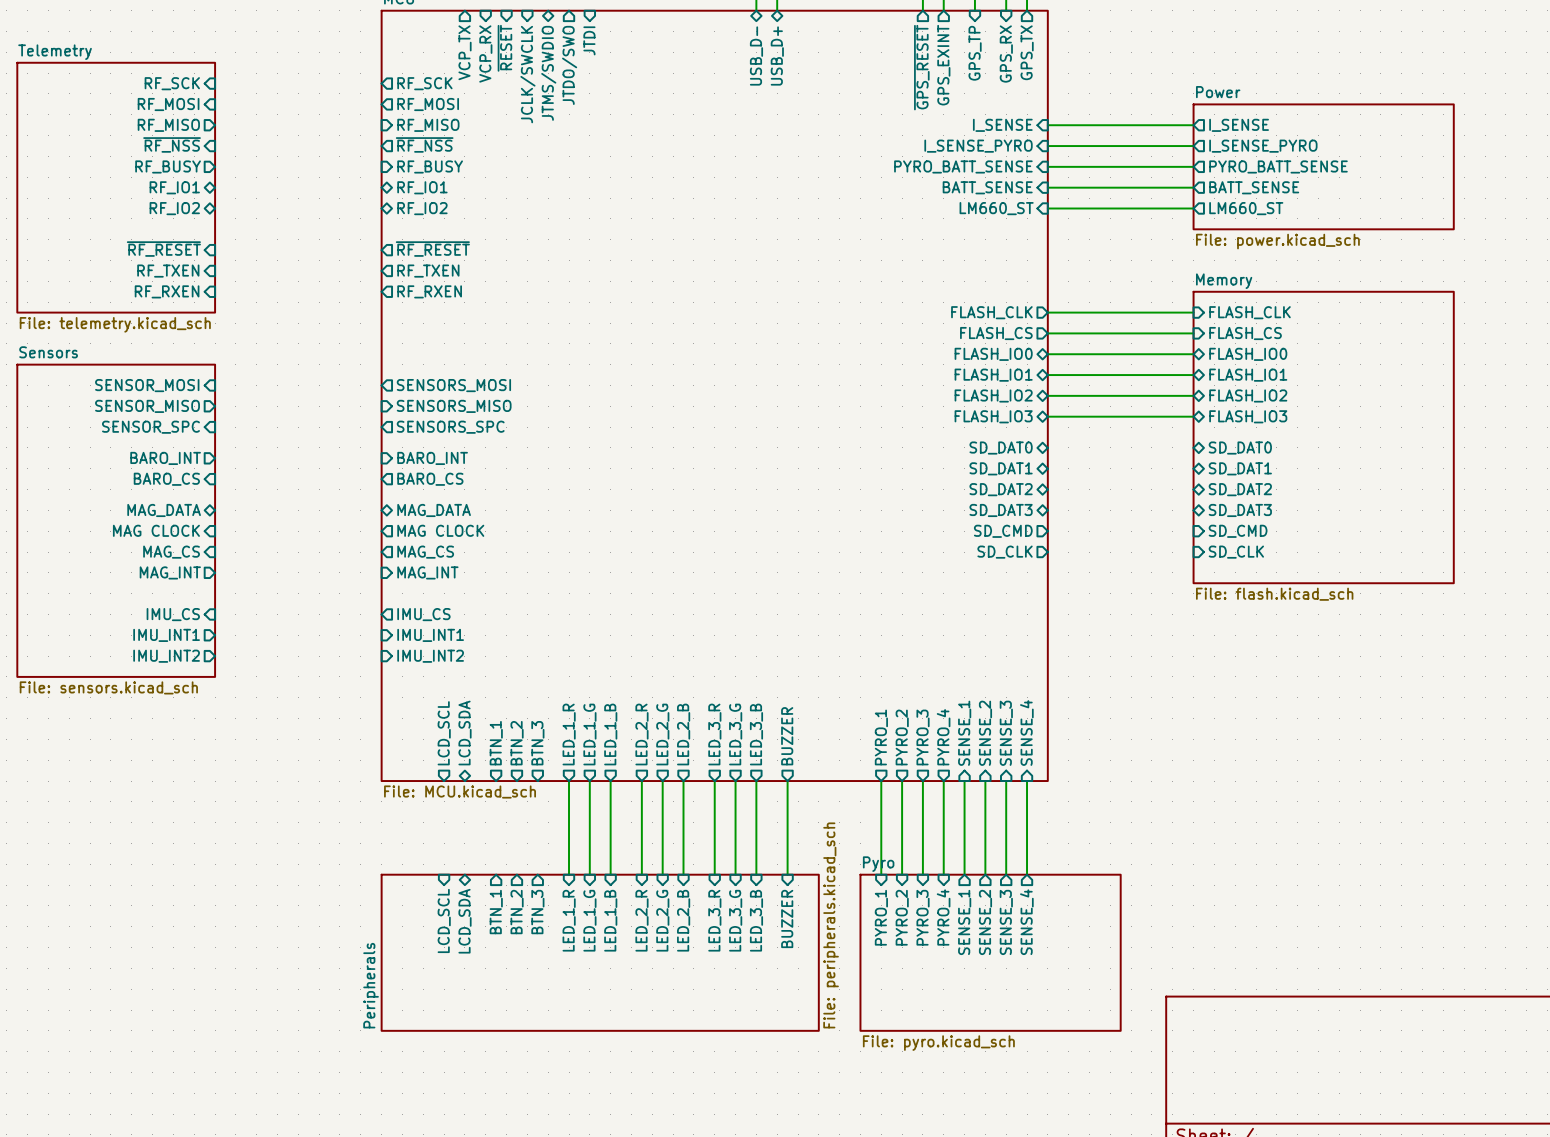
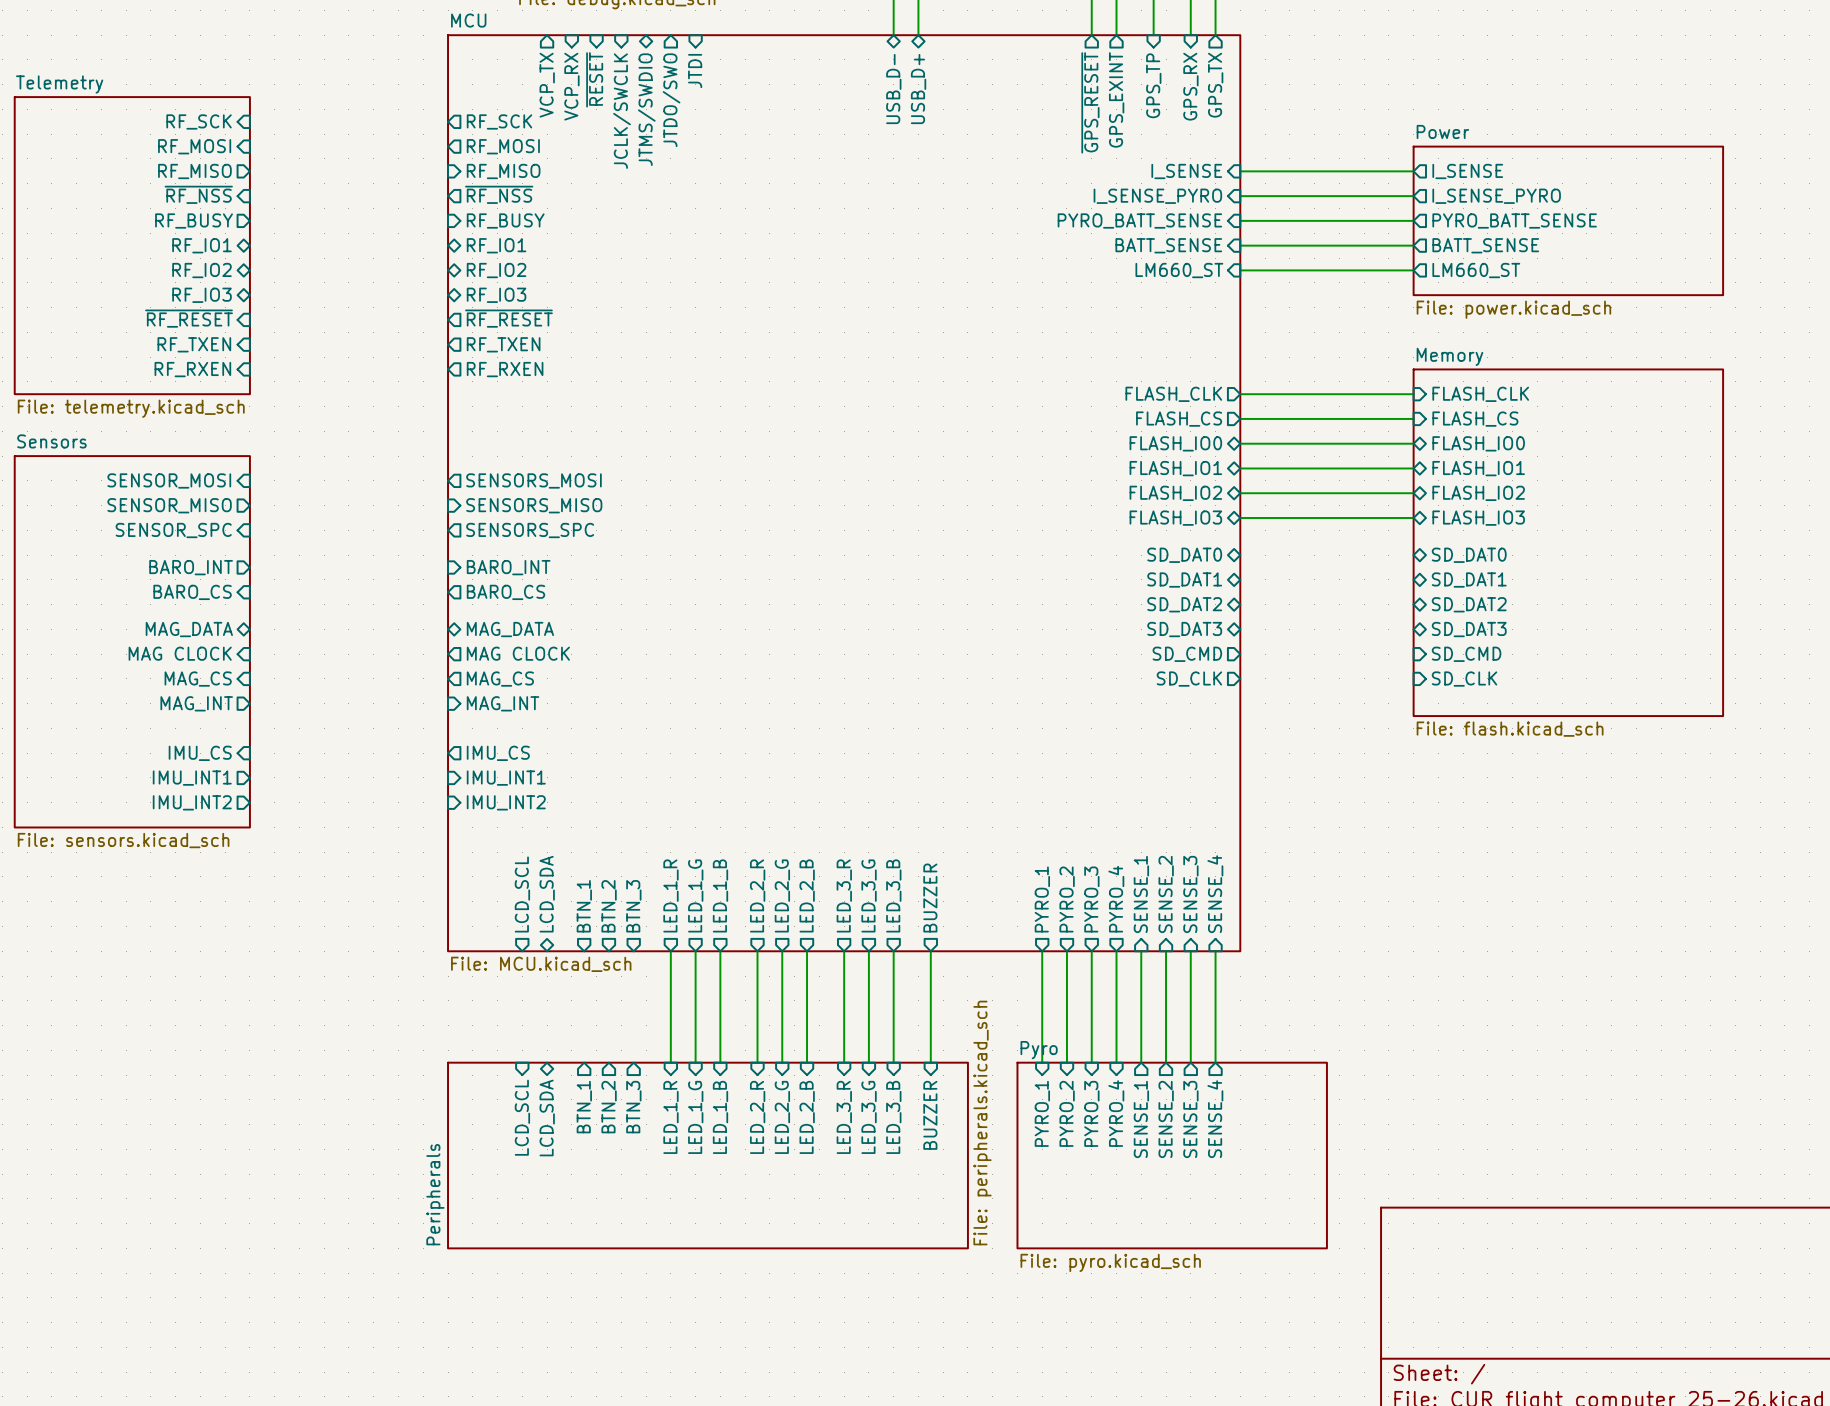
sheet pin: none -> RF_IO3 (201, 295)
sheet pin: none -> RF_IO3 (496, 295)

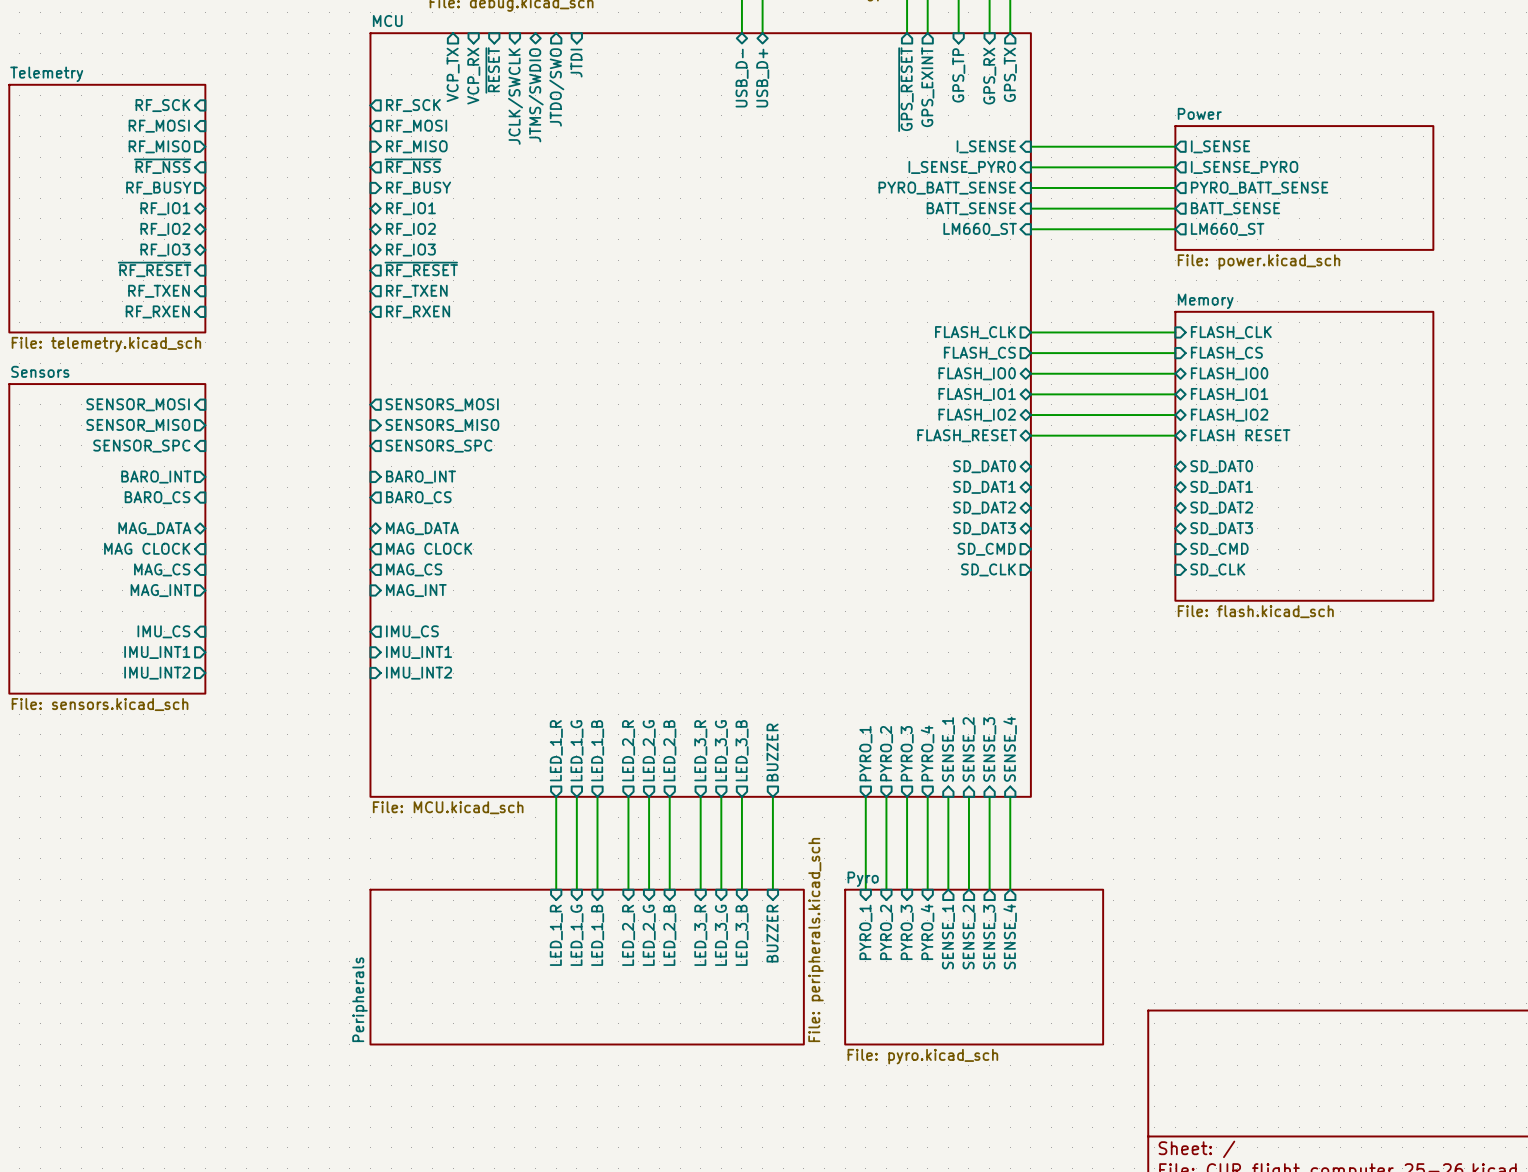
sheet pin: FLASH_IO3 (1175, 518) -> FLASH_RESET (967, 435)
sheet pin: FLASH_IO3 (1478, 518) -> FLASH RESET (1240, 435)
sheet pin: LCD_SCL (522, 894) -> none
sheet pin: LCD_SDA (547, 894) -> none
sheet pin: BTN_1 (584, 906) -> none
sheet pin: BTN_2 (609, 906) -> none
sheet pin: BTN_3 (633, 906) -> none
sheet pin: BTN_1 (584, 1107) -> none
sheet pin: BTN_2 (609, 1107) -> none
sheet pin: BTN_3 (633, 1107) -> none
sheet pin: LCD_SCL (522, 1117) -> none
sheet pin: LCD_SDA (547, 1117) -> none

